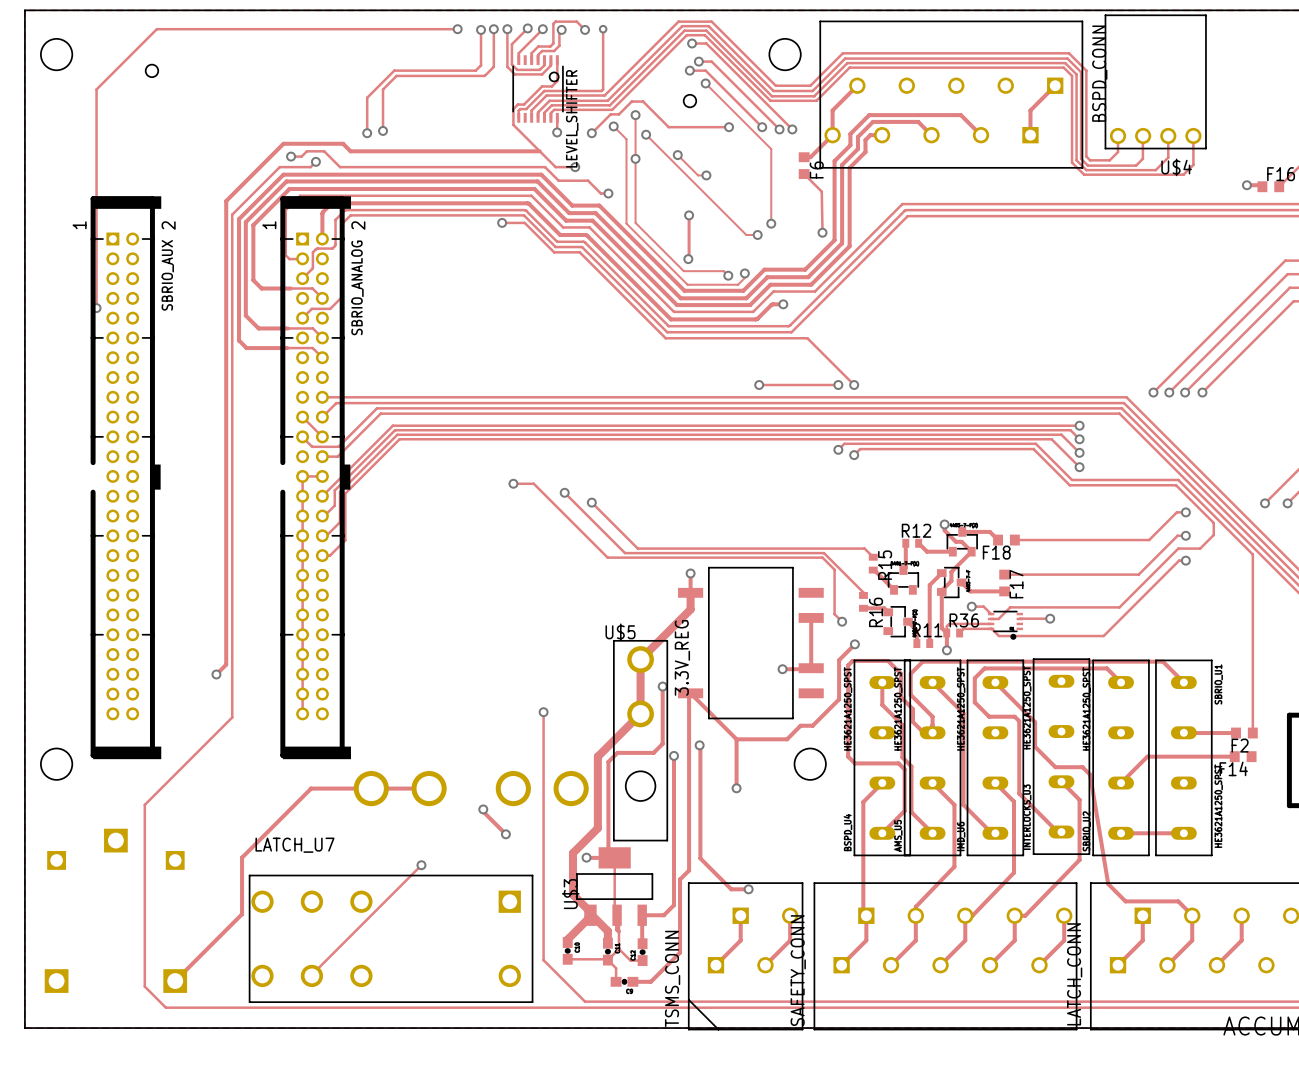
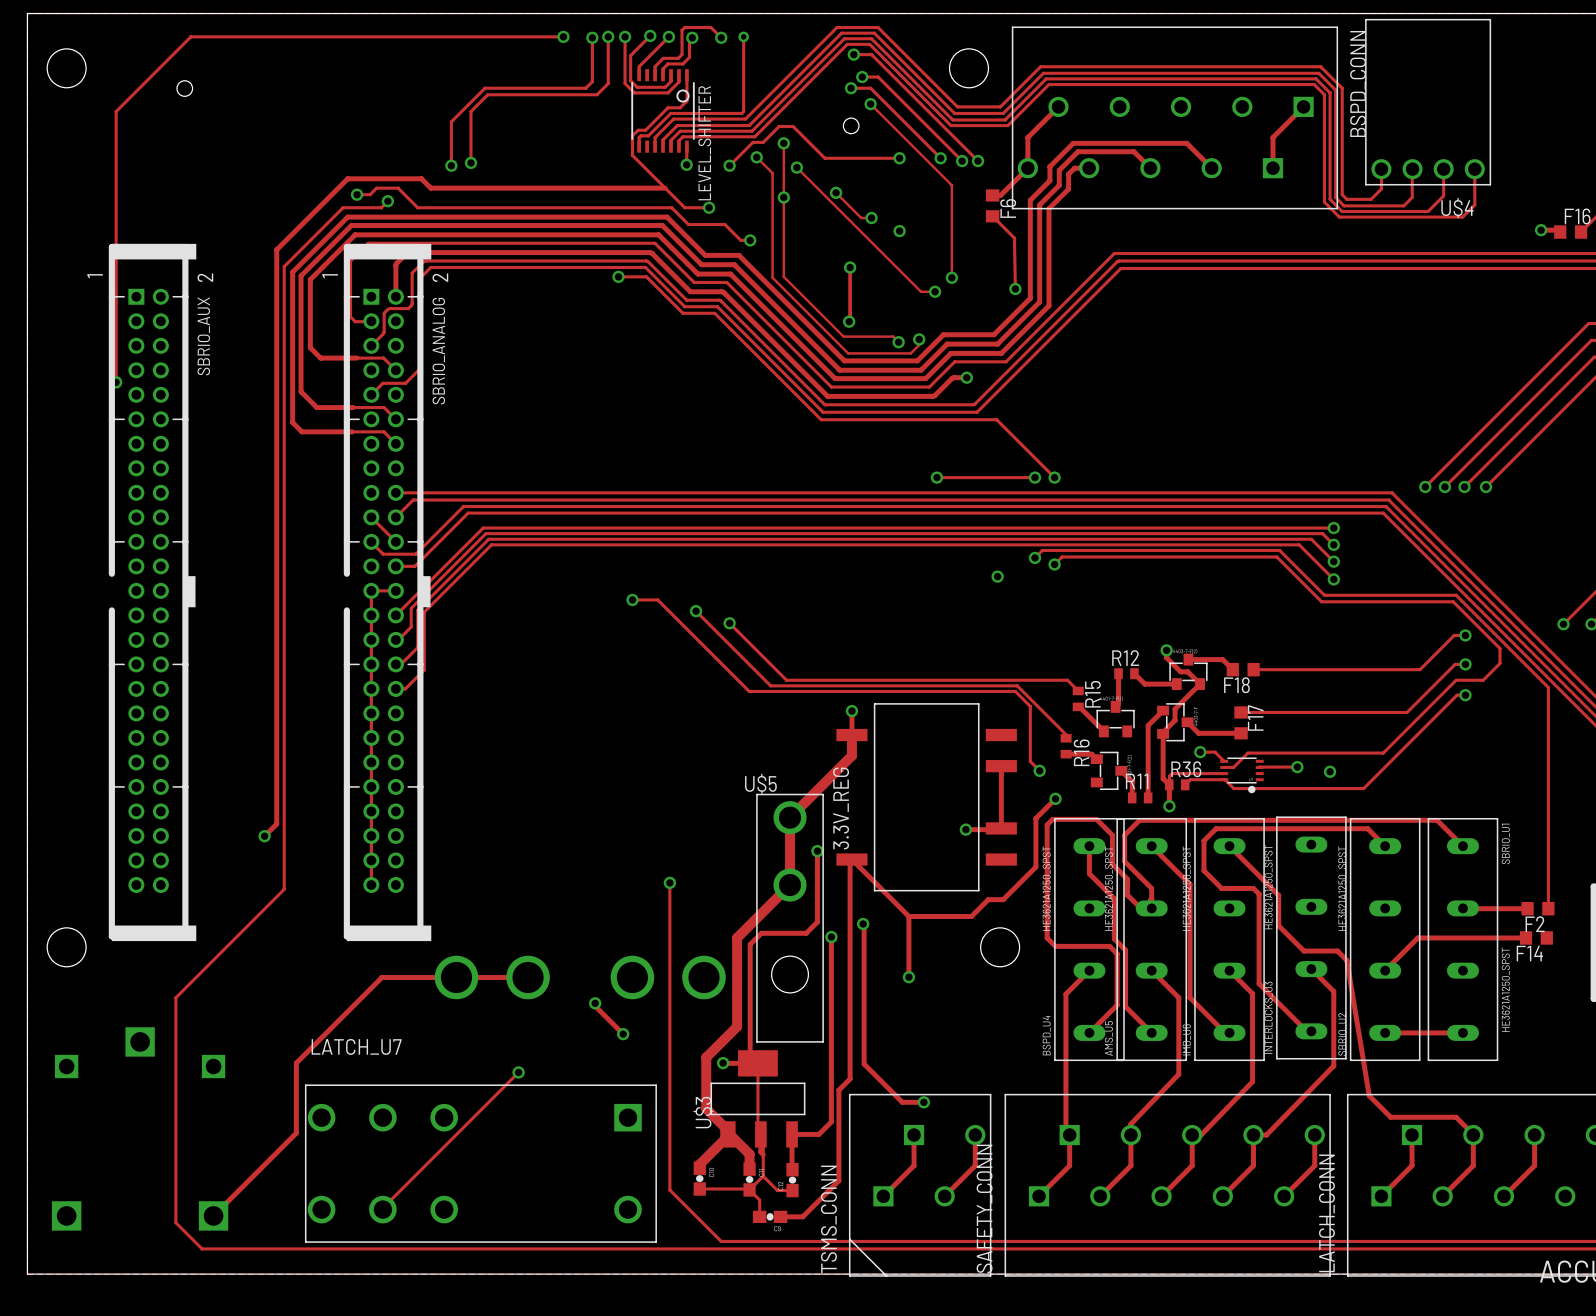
via: none -> (899, 231)
via: none -> (997, 576)
via: none -> (1330, 771)

